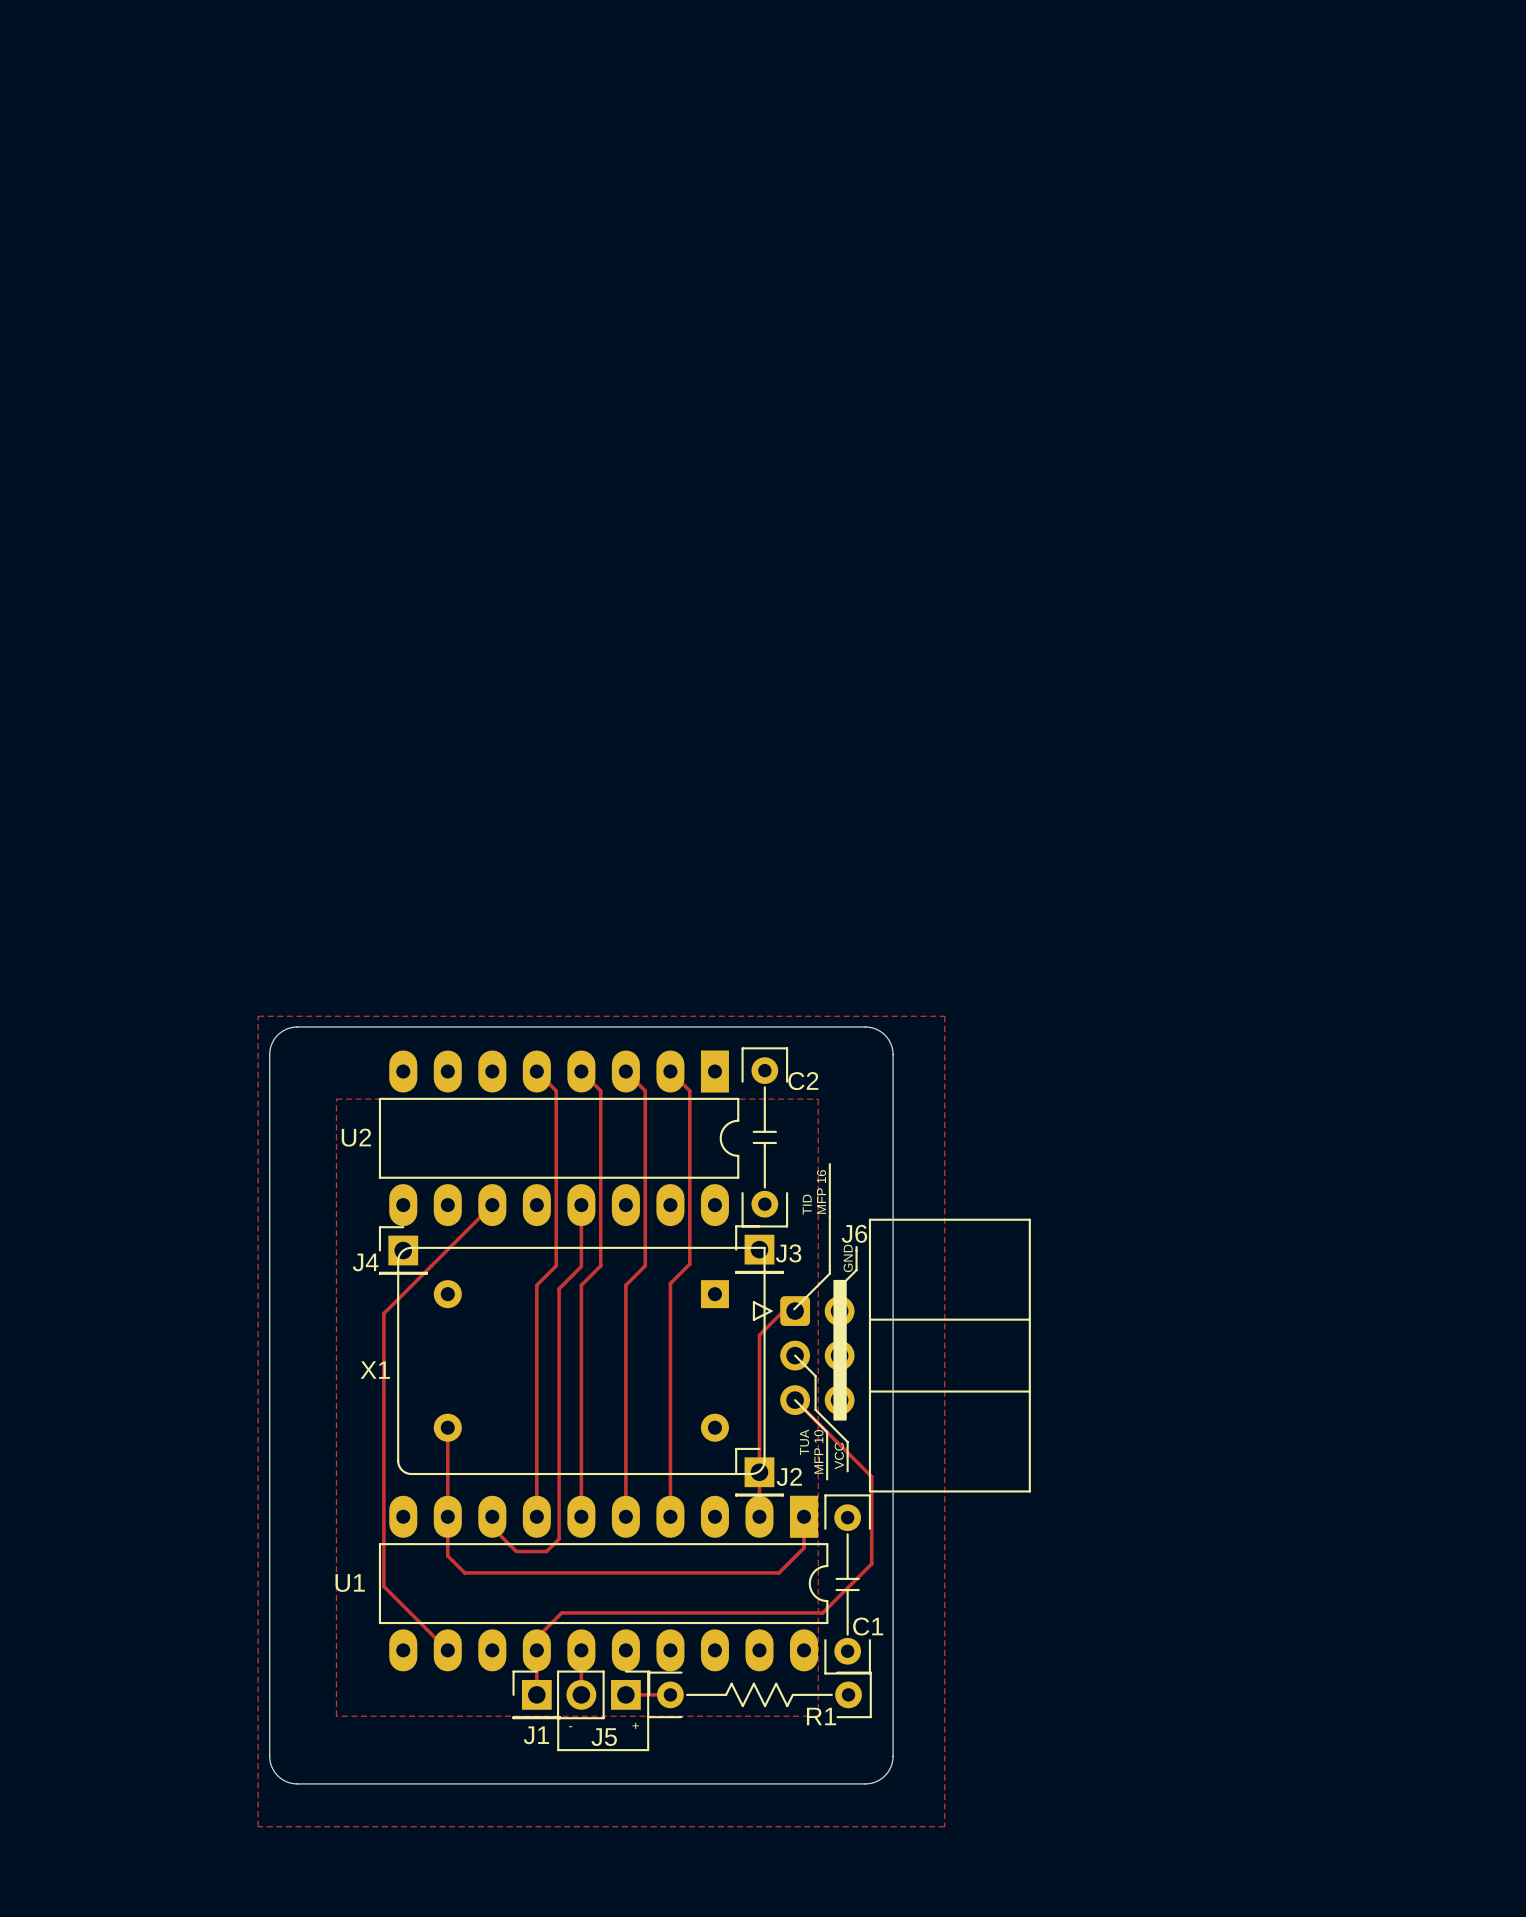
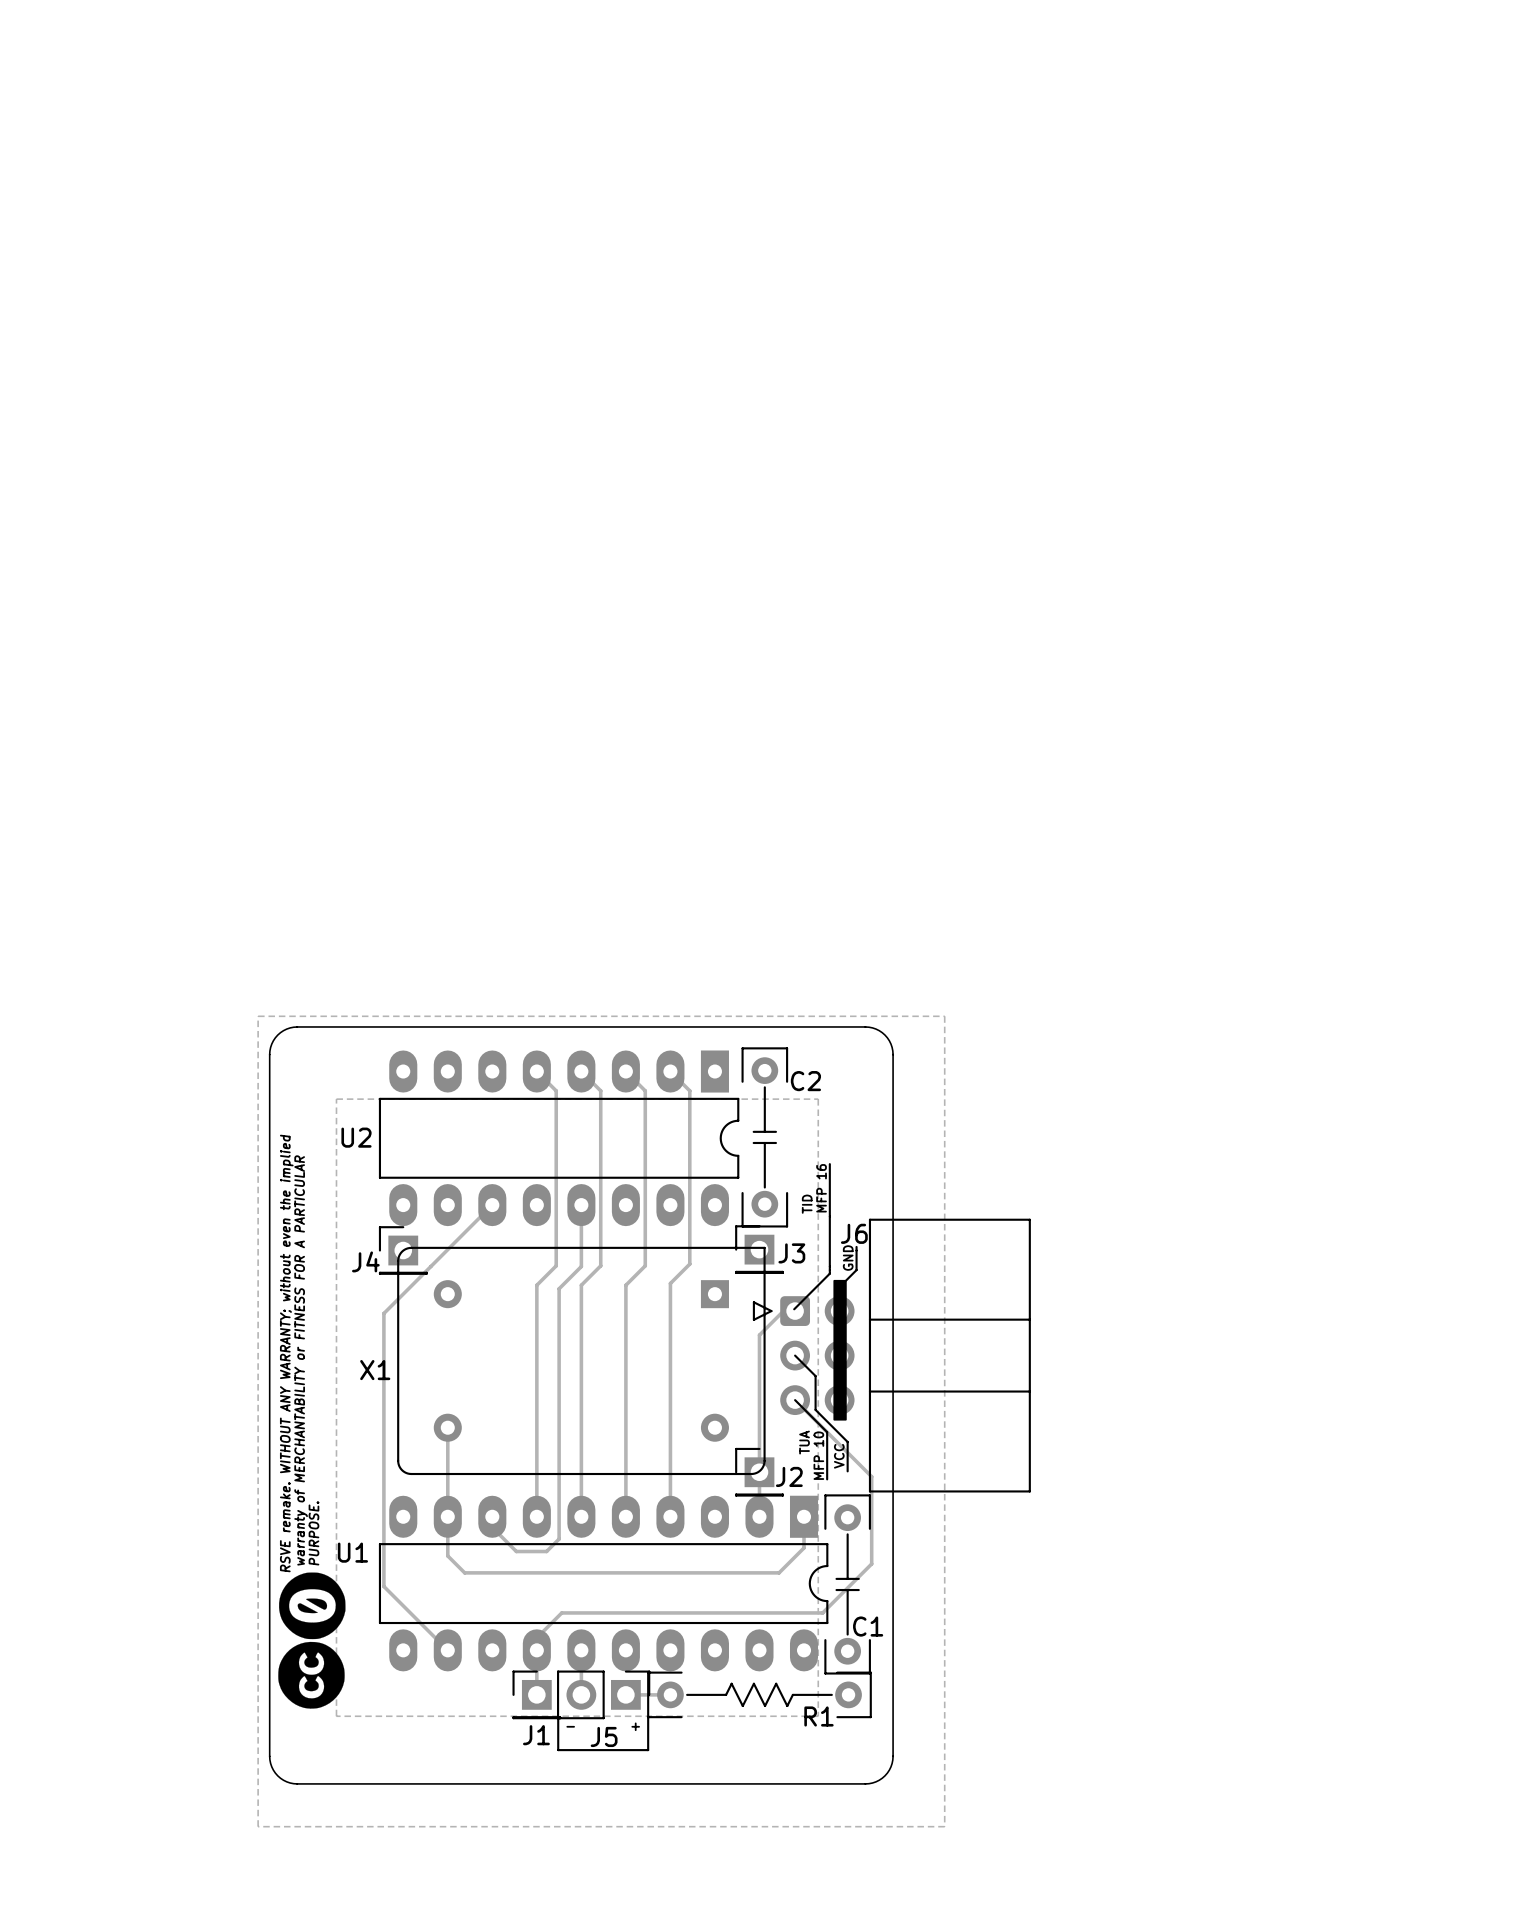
text: none -> RSVE remake. WITHOUT ANY WARRANTY; without even the implied (286, 1353)
text: none -> warranty of MERCHANTABILITY or FITNESS FOR A PARTICULAR (301, 1360)
text: none -> PURPOSE. (313, 1533)
drawing: none -> [278, 1572, 346, 1709]
U1 name position: U1 (350, 1583) -> U1 (352, 1552)

